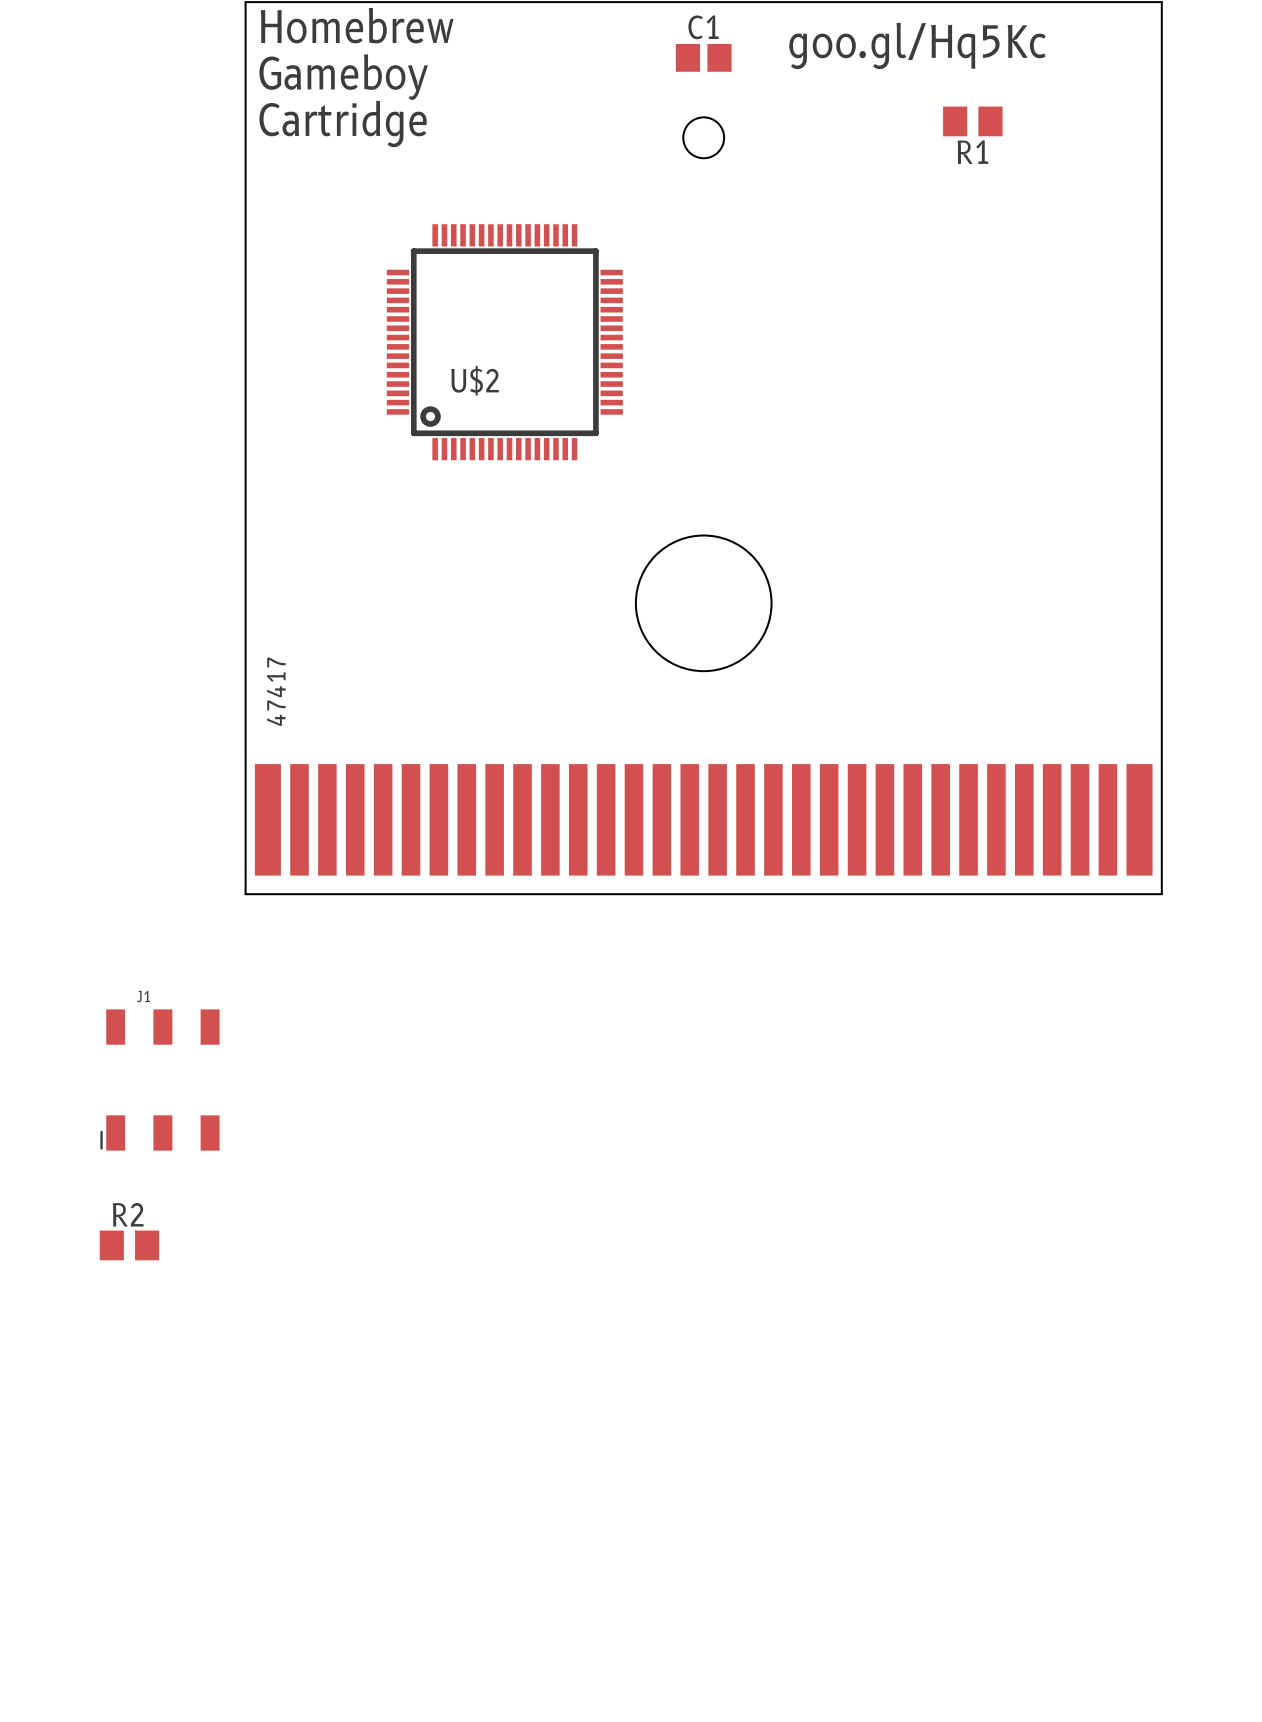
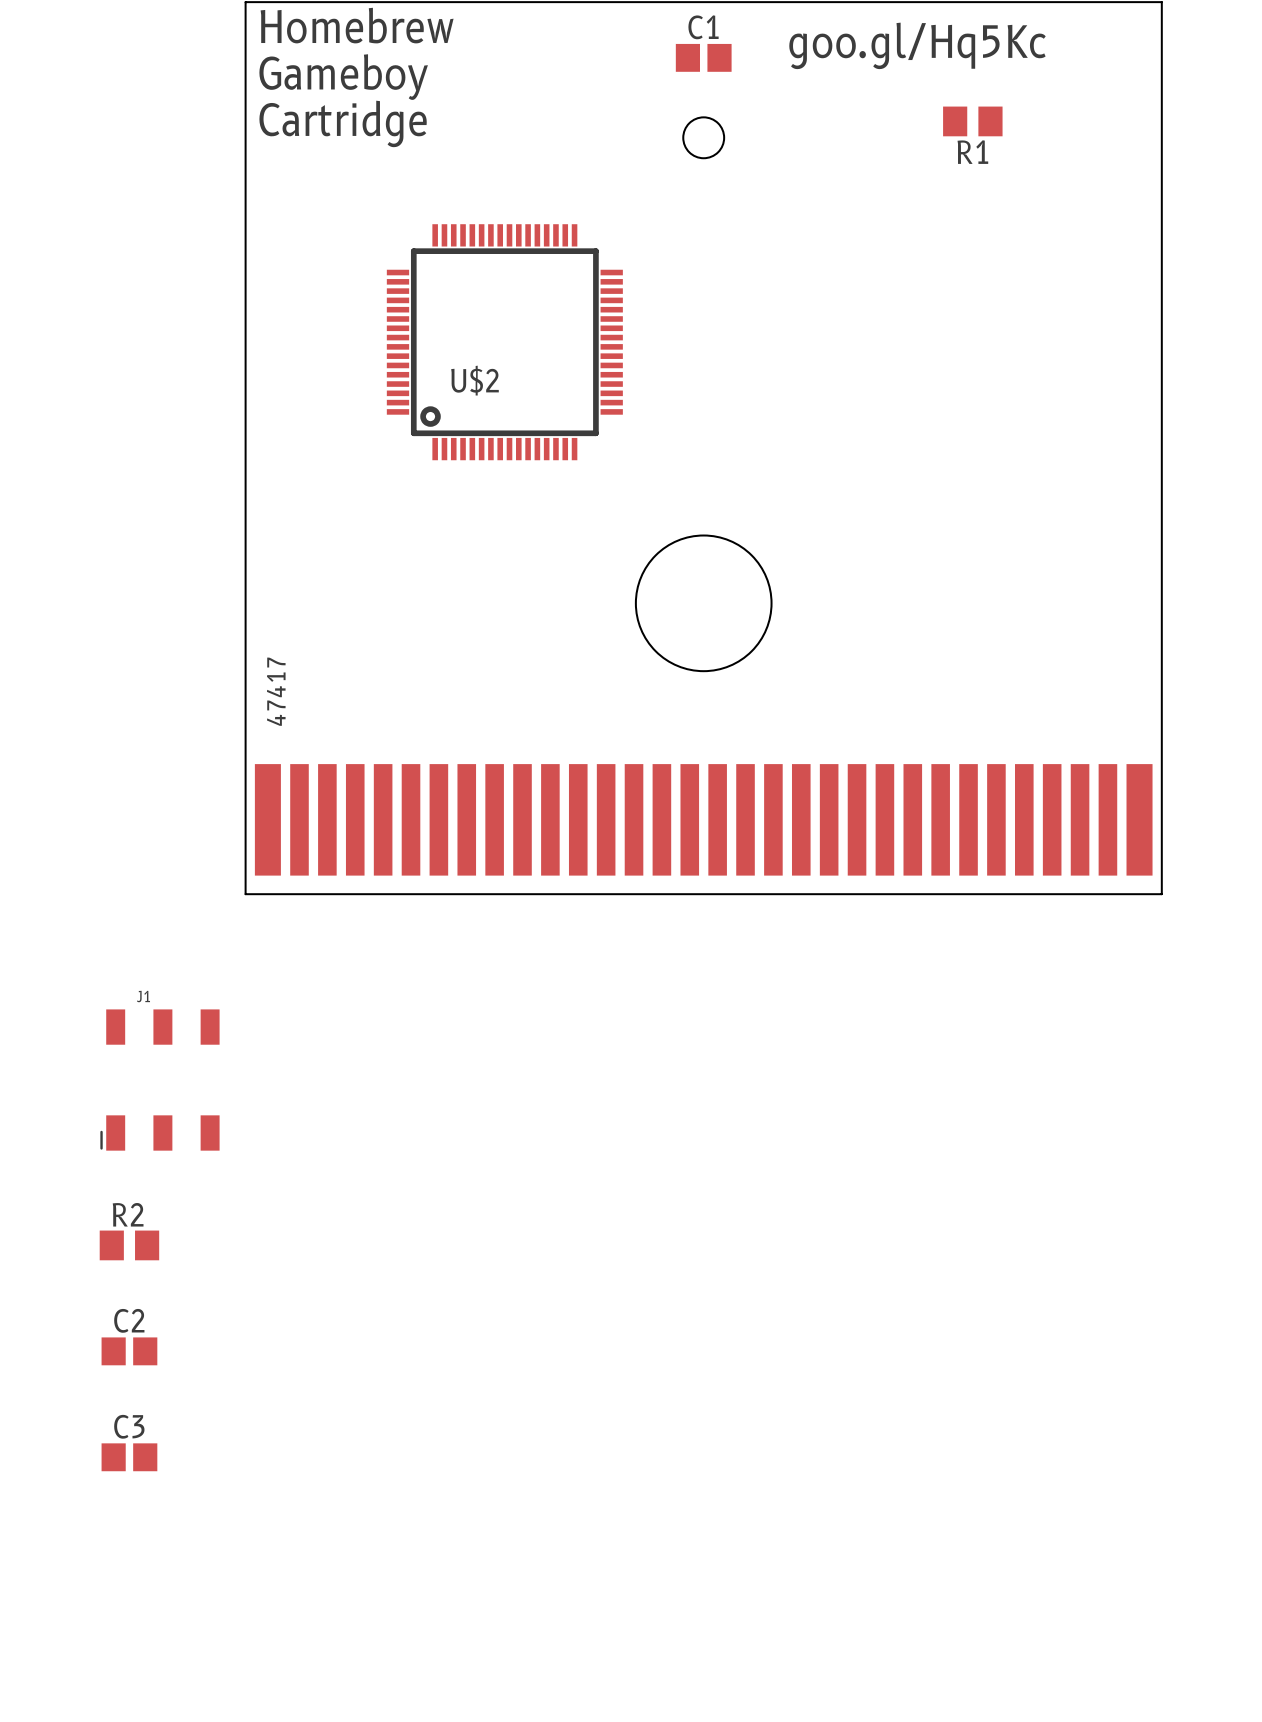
C2: none -> (129, 1351)
C3: none -> (129, 1457)

